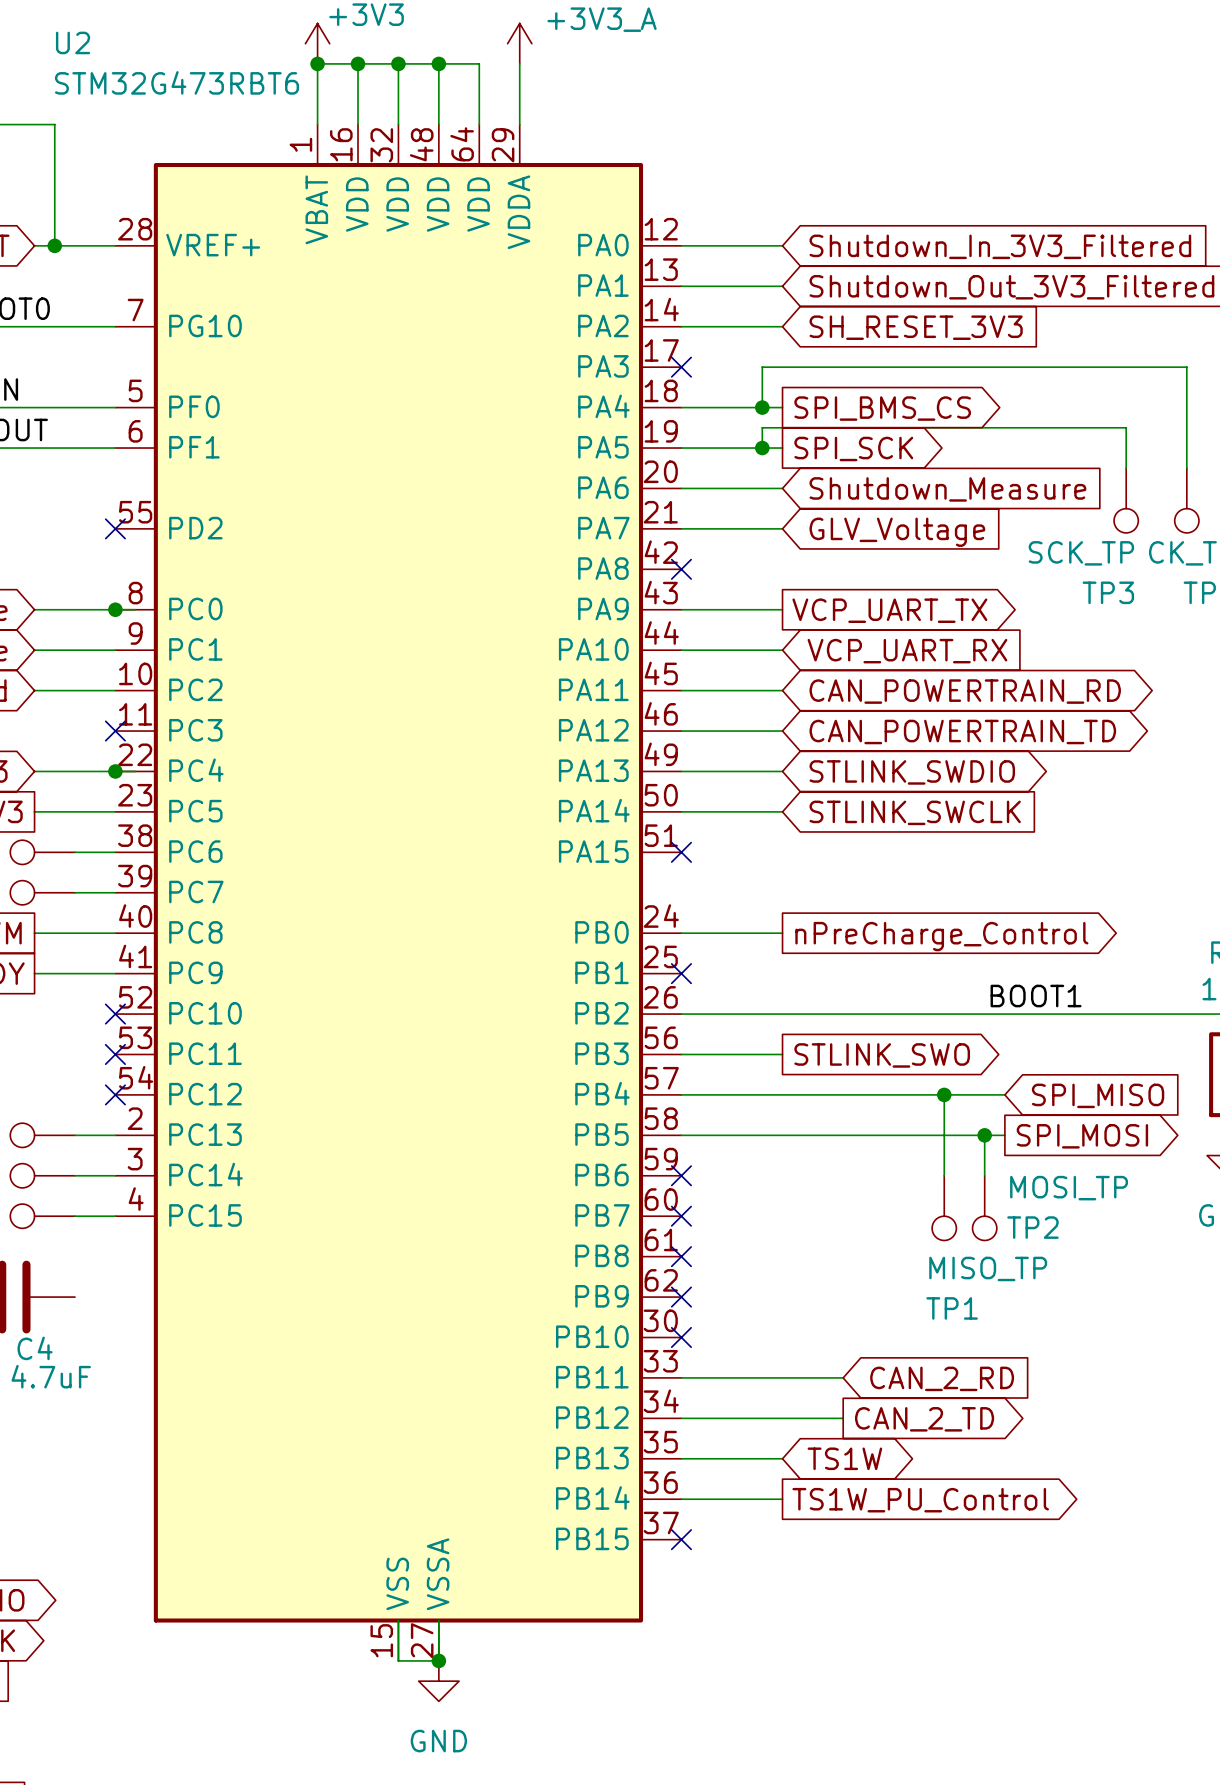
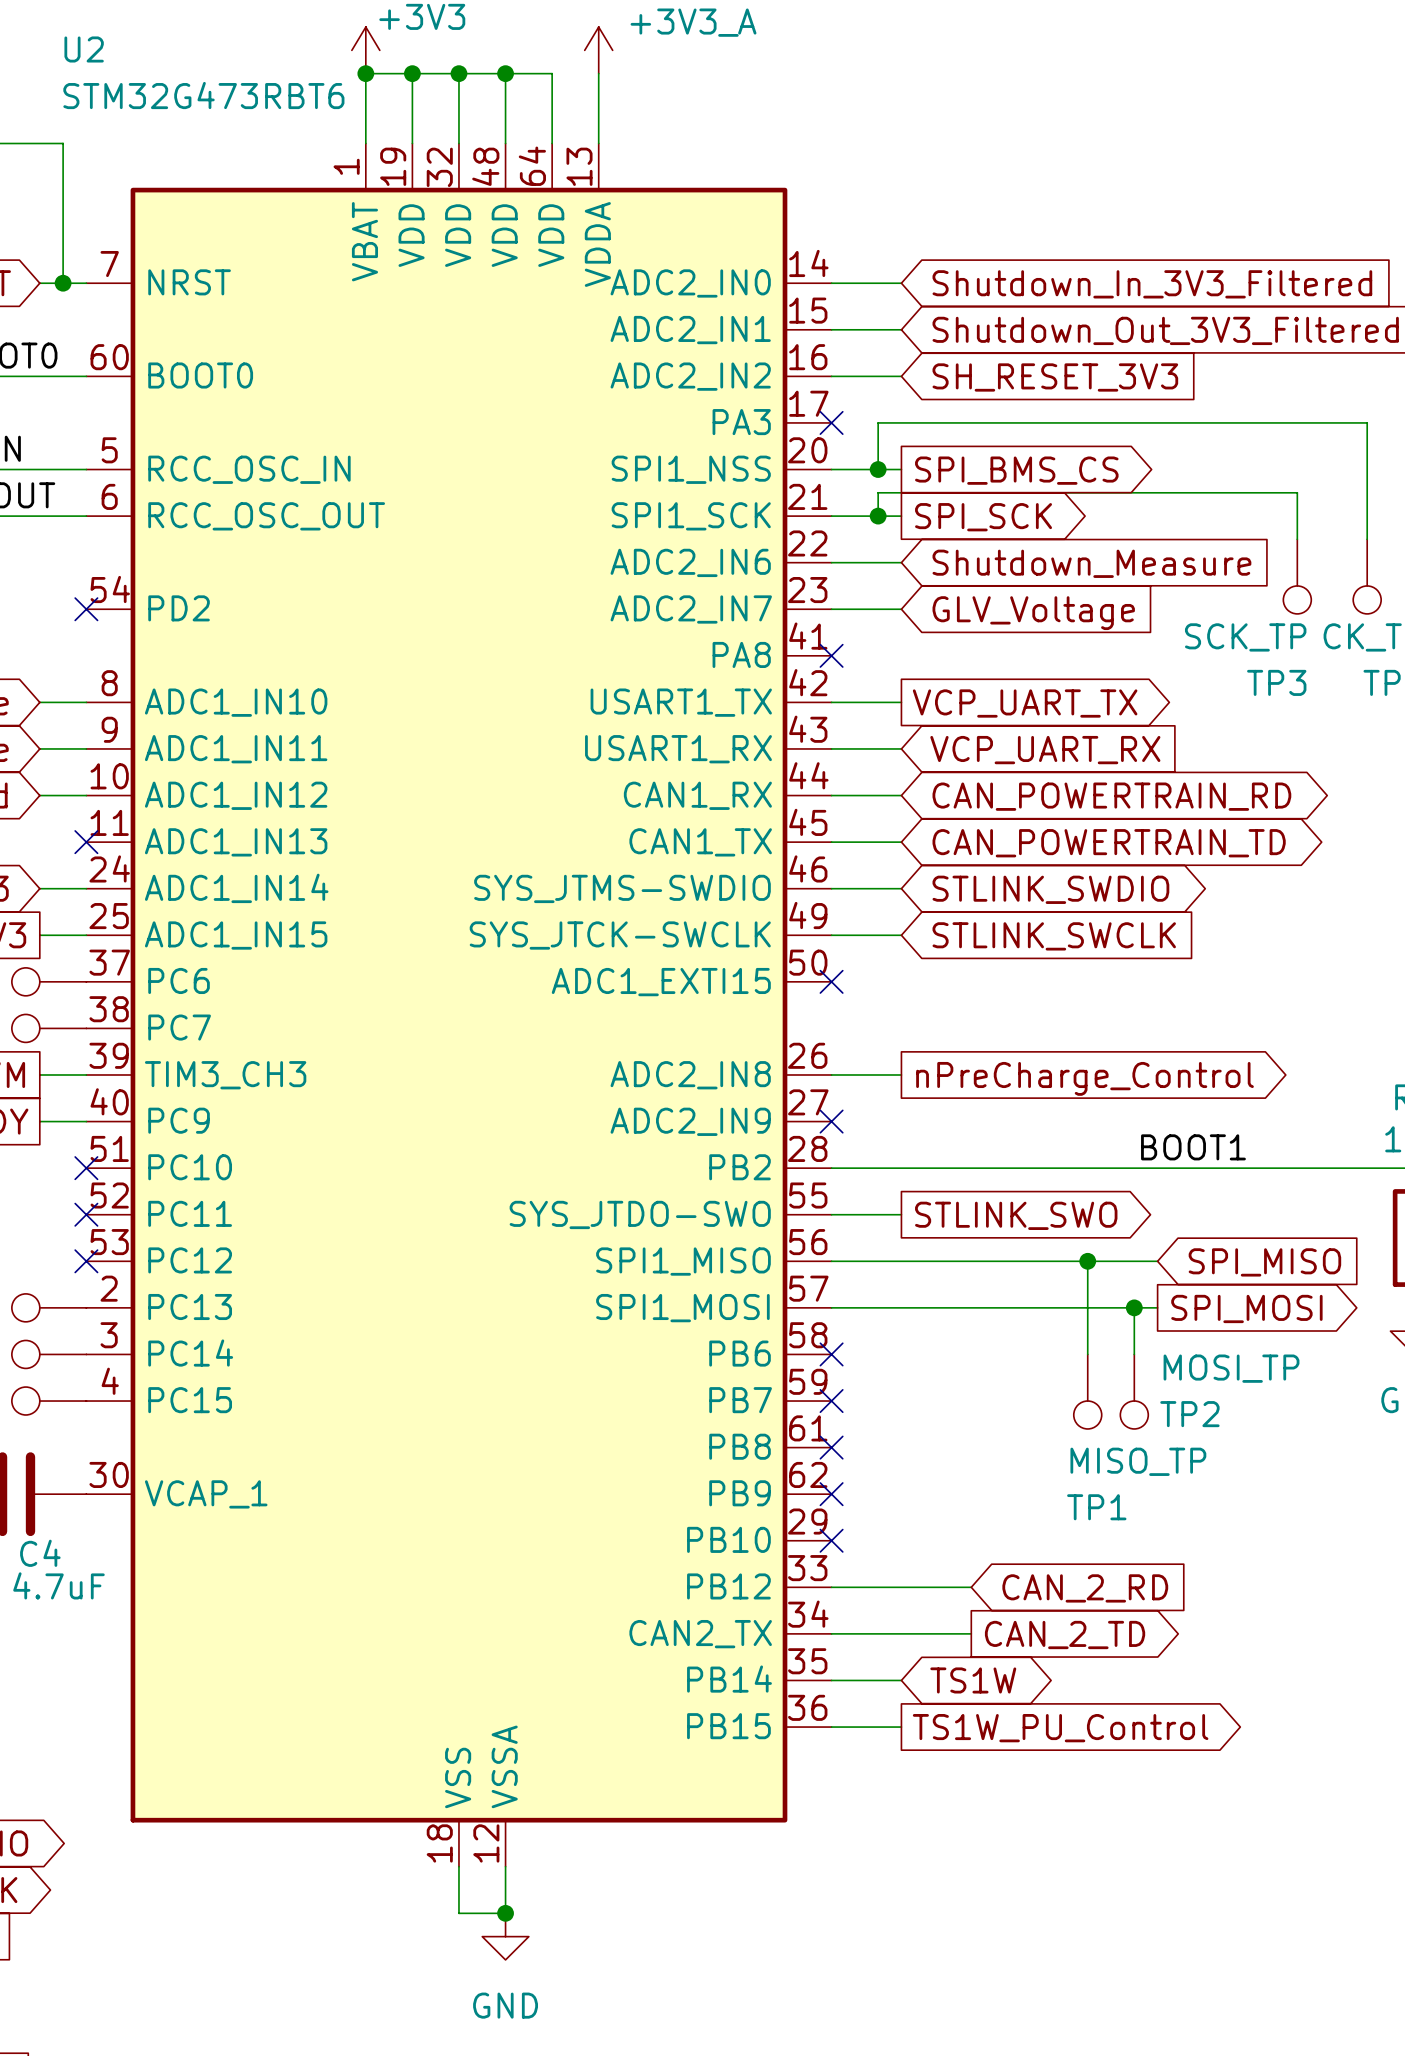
U2 symbol: [115, 124, 682, 1661] -> [86, 143, 832, 1867]
no-connect mark position: (681, 367) -> (831, 422)
no-connect mark position: (115, 528) -> (86, 609)
no-connect mark position: (681, 569) -> (831, 655)
junction: (115, 609) -> none
no-connect mark position: (115, 731) -> (86, 842)
junction: (115, 771) -> none
no-connect mark position: (681, 852) -> (831, 981)
no-connect mark position: (681, 973) -> (831, 1121)
no-connect mark: none -> (86, 1168)
no-connect mark: (115, 1014) -> none
no-connect mark: none -> (86, 1214)
no-connect mark: (115, 1054) -> none
no-connect mark: none -> (86, 1261)
no-connect mark: (115, 1094) -> none
no-connect mark: (681, 1175) -> none
no-connect mark: none -> (831, 1354)
no-connect mark: (681, 1216) -> none
no-connect mark: none -> (831, 1401)
no-connect mark: (681, 1256) -> none
no-connect mark: none -> (831, 1447)
no-connect mark: (681, 1297) -> none
no-connect mark: none -> (831, 1494)
no-connect mark: (681, 1337) -> none
no-connect mark: none -> (831, 1540)
no-connect mark: (681, 1539) -> none

